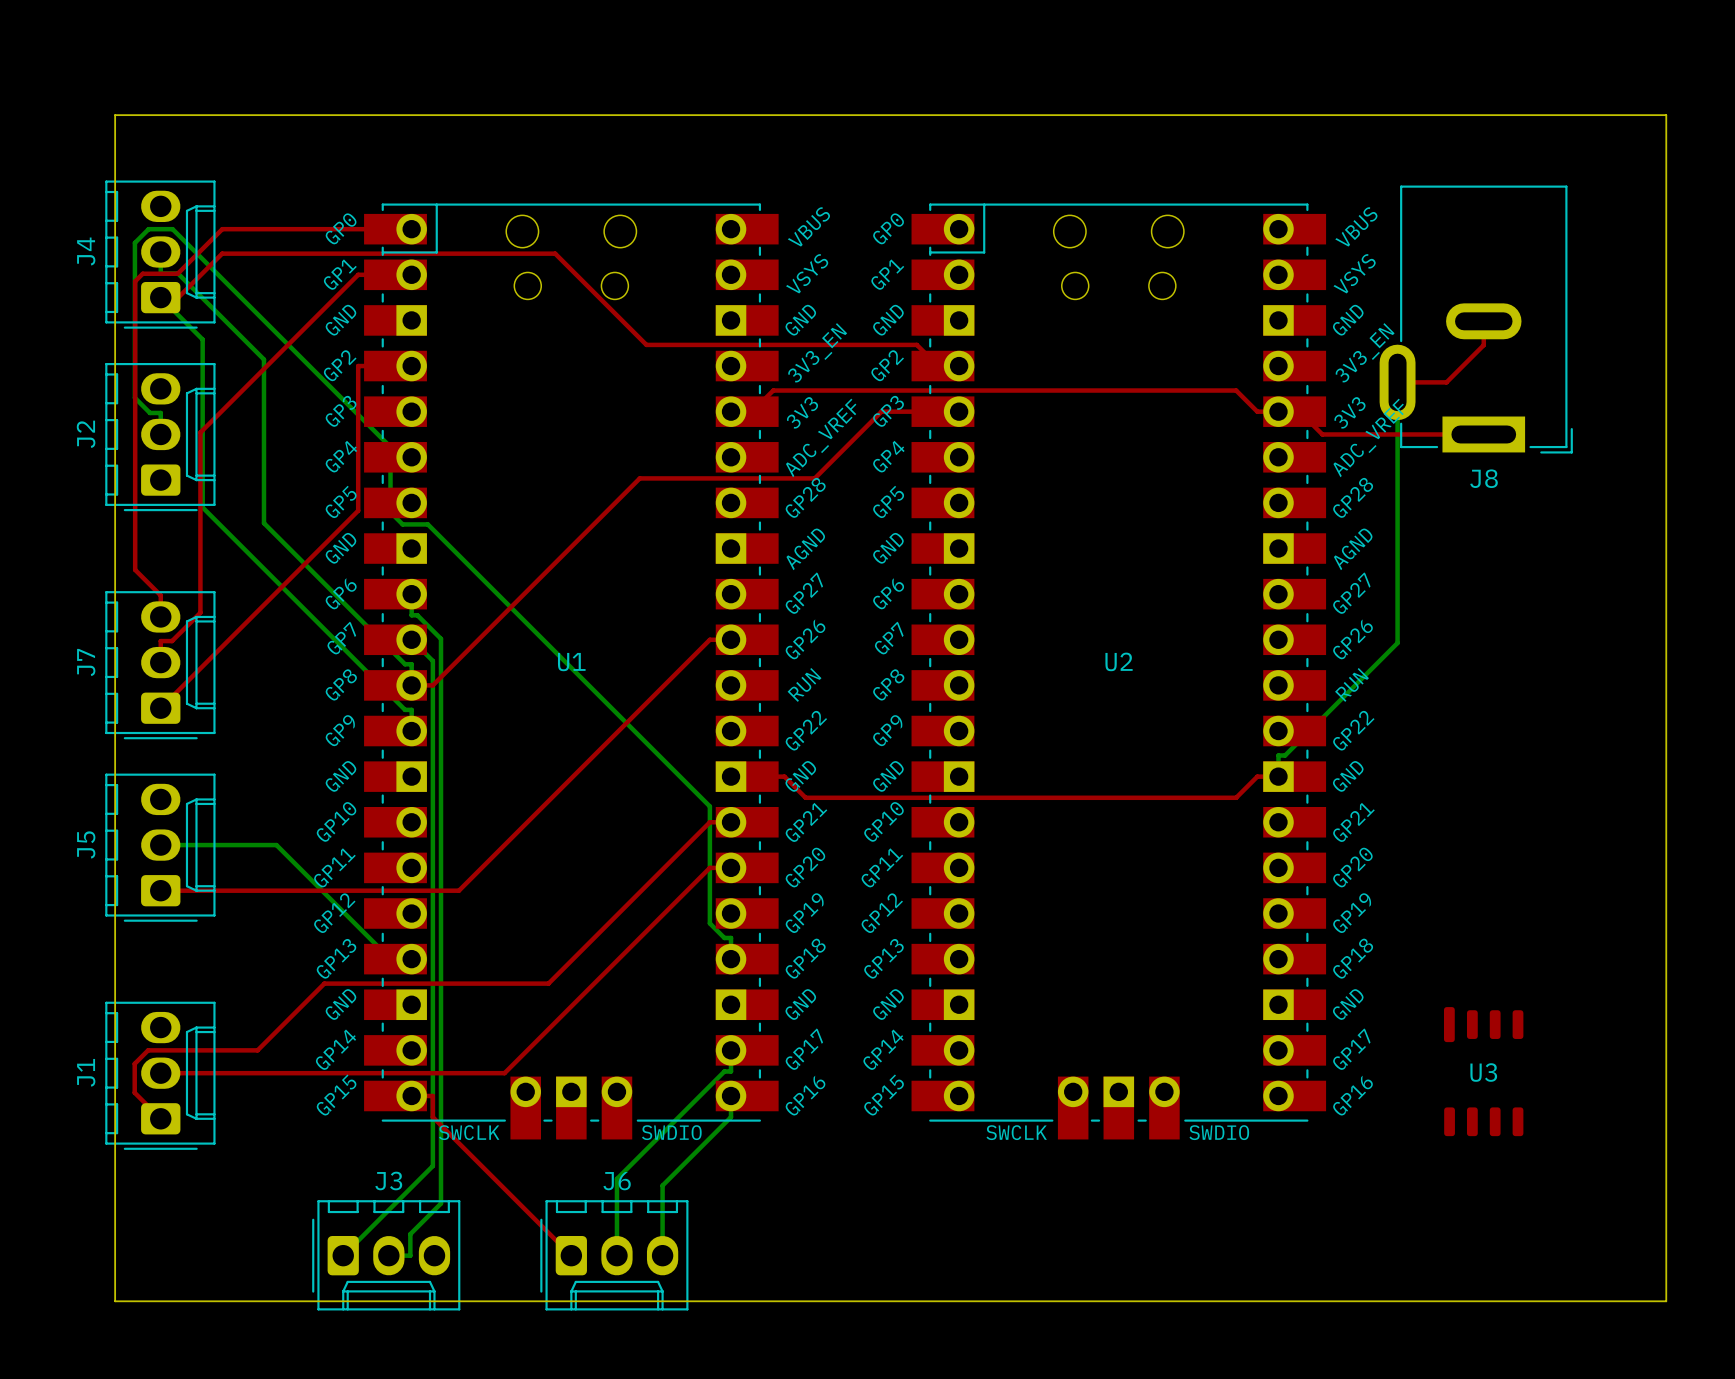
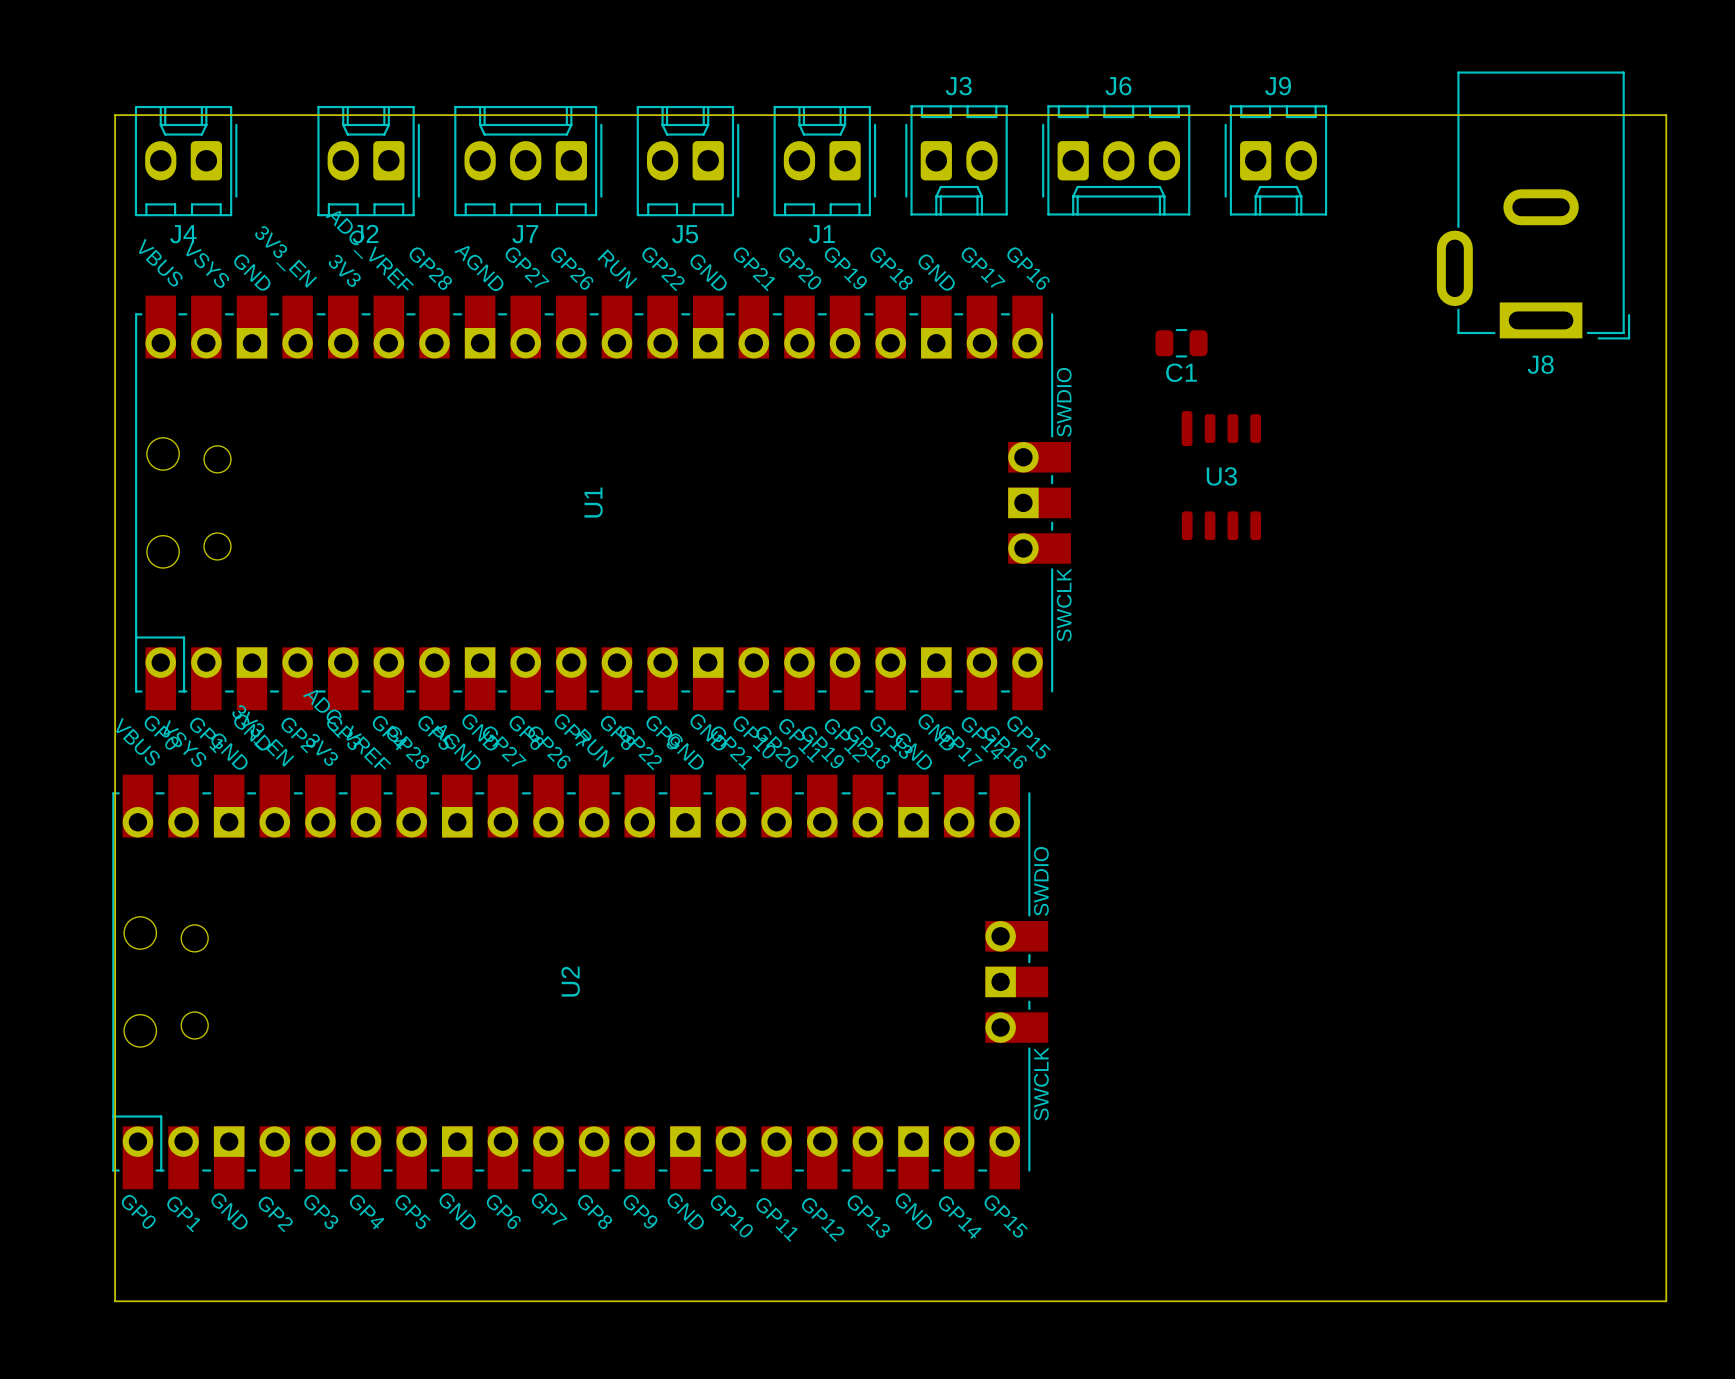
J9: none -> (1275, 160)
J4 footprint: [105, 180, 216, 329] -> [134, 105, 238, 217]
top track: (411, 229) (222, 229) (177, 273) (142, 273) (135, 281) (135, 569) (160, 595) (160, 616) -> none
J4 name position: J4 (86, 251) -> J4 (183, 234)
bottom track: (160, 251) (160, 273) (177, 273) (263, 359) (263, 523) (405, 664) (411, 664) (411, 685) -> none
top track: (411, 274) (358, 274) (200, 432) (200, 612) (172, 641) (160, 641) (160, 662) -> none
top track: (160, 297) (178, 297) (222, 253) (555, 253) (646, 344) (916, 344) (937, 366) (959, 366) -> none
bottom track: (160, 297) (202, 339) (202, 507) (405, 709) (411, 709) (411, 731) -> none
J8 position: (1476, 319) -> (1533, 205)
top track: (1483, 321) (1483, 345) (1446, 382) (1397, 382) -> none
C1: none -> (1181, 343)
J2 footprint: [105, 362, 216, 512] -> [317, 105, 420, 217]
top track: (411, 366) (358, 366) (358, 510) (160, 708) -> none
bottom track: (1397, 382) (1397, 643) (1285, 755) (1278, 755) (1278, 776) -> none
top track: (731, 411) (752, 411) (773, 390) (1236, 390) (1257, 411) (1299, 411) (1322, 434) (1483, 434) -> none
top track: (959, 411) (881, 411) (814, 478) (639, 478) (432, 685) (411, 685) -> none
J2 name position: J2 (86, 434) -> J2 (365, 234)
bottom track: (160, 434) (160, 412) (150, 412) (134, 397) (134, 242) (148, 229) (172, 229) (390, 447) (390, 512) (402, 524) (427, 524) (709, 806) (709, 923) (724, 937) (731, 937) (731, 959) -> none
bottom track: (411, 594) (411, 615) (417, 615) (441, 638) (441, 1203) (410, 1234) (410, 1255) (388, 1255) -> none
bottom track: (411, 639) (432, 660) (432, 1166) (343, 1255) -> none
top track: (731, 639) (709, 639) (458, 890) (160, 890) -> none
J7 rotation: 0° (160, 665) -> 90° counterclockwise (528, 161)
J7 position: (160, 665) -> (528, 161)
U1 rotation: 0° (571, 671) -> 90° counterclockwise (603, 502)
U2 rotation: 0° (1118, 671) -> 90° counterclockwise (580, 981)
U2 position: (1118, 671) -> (580, 981)
J5 footprint: [105, 773, 216, 922] -> [636, 105, 740, 217]
top track: (731, 776) (784, 776) (805, 797) (1236, 797) (1257, 776) (1278, 776) -> none
top track: (731, 822) (709, 822) (548, 983) (324, 983) (257, 1050) (148, 1050) (134, 1063) (134, 1092) (160, 1118) -> none
J5 name position: J5 (86, 844) -> J5 (685, 234)
bottom track: (160, 845) (276, 845) (390, 959) (411, 959) -> none
top track: (731, 867) (709, 867) (504, 1073) (160, 1073) -> none
J1 footprint: [105, 1001, 216, 1150] -> [773, 105, 877, 217]
bottom track: (731, 1050) (731, 1071) (724, 1071) (616, 1178) (616, 1255) -> none
U3 position: (1483, 1071) -> (1221, 475)
J1 name position: J1 (86, 1072) -> J1 (821, 234)
top track: (411, 1095) (432, 1095) (432, 1117) (571, 1255) -> none
bottom track: (731, 1095) (731, 1117) (662, 1185) (662, 1255) -> none
J3 footprint: [312, 1200, 461, 1311] -> [905, 105, 1008, 216]
J6 position: (614, 1255) -> (1116, 160)

